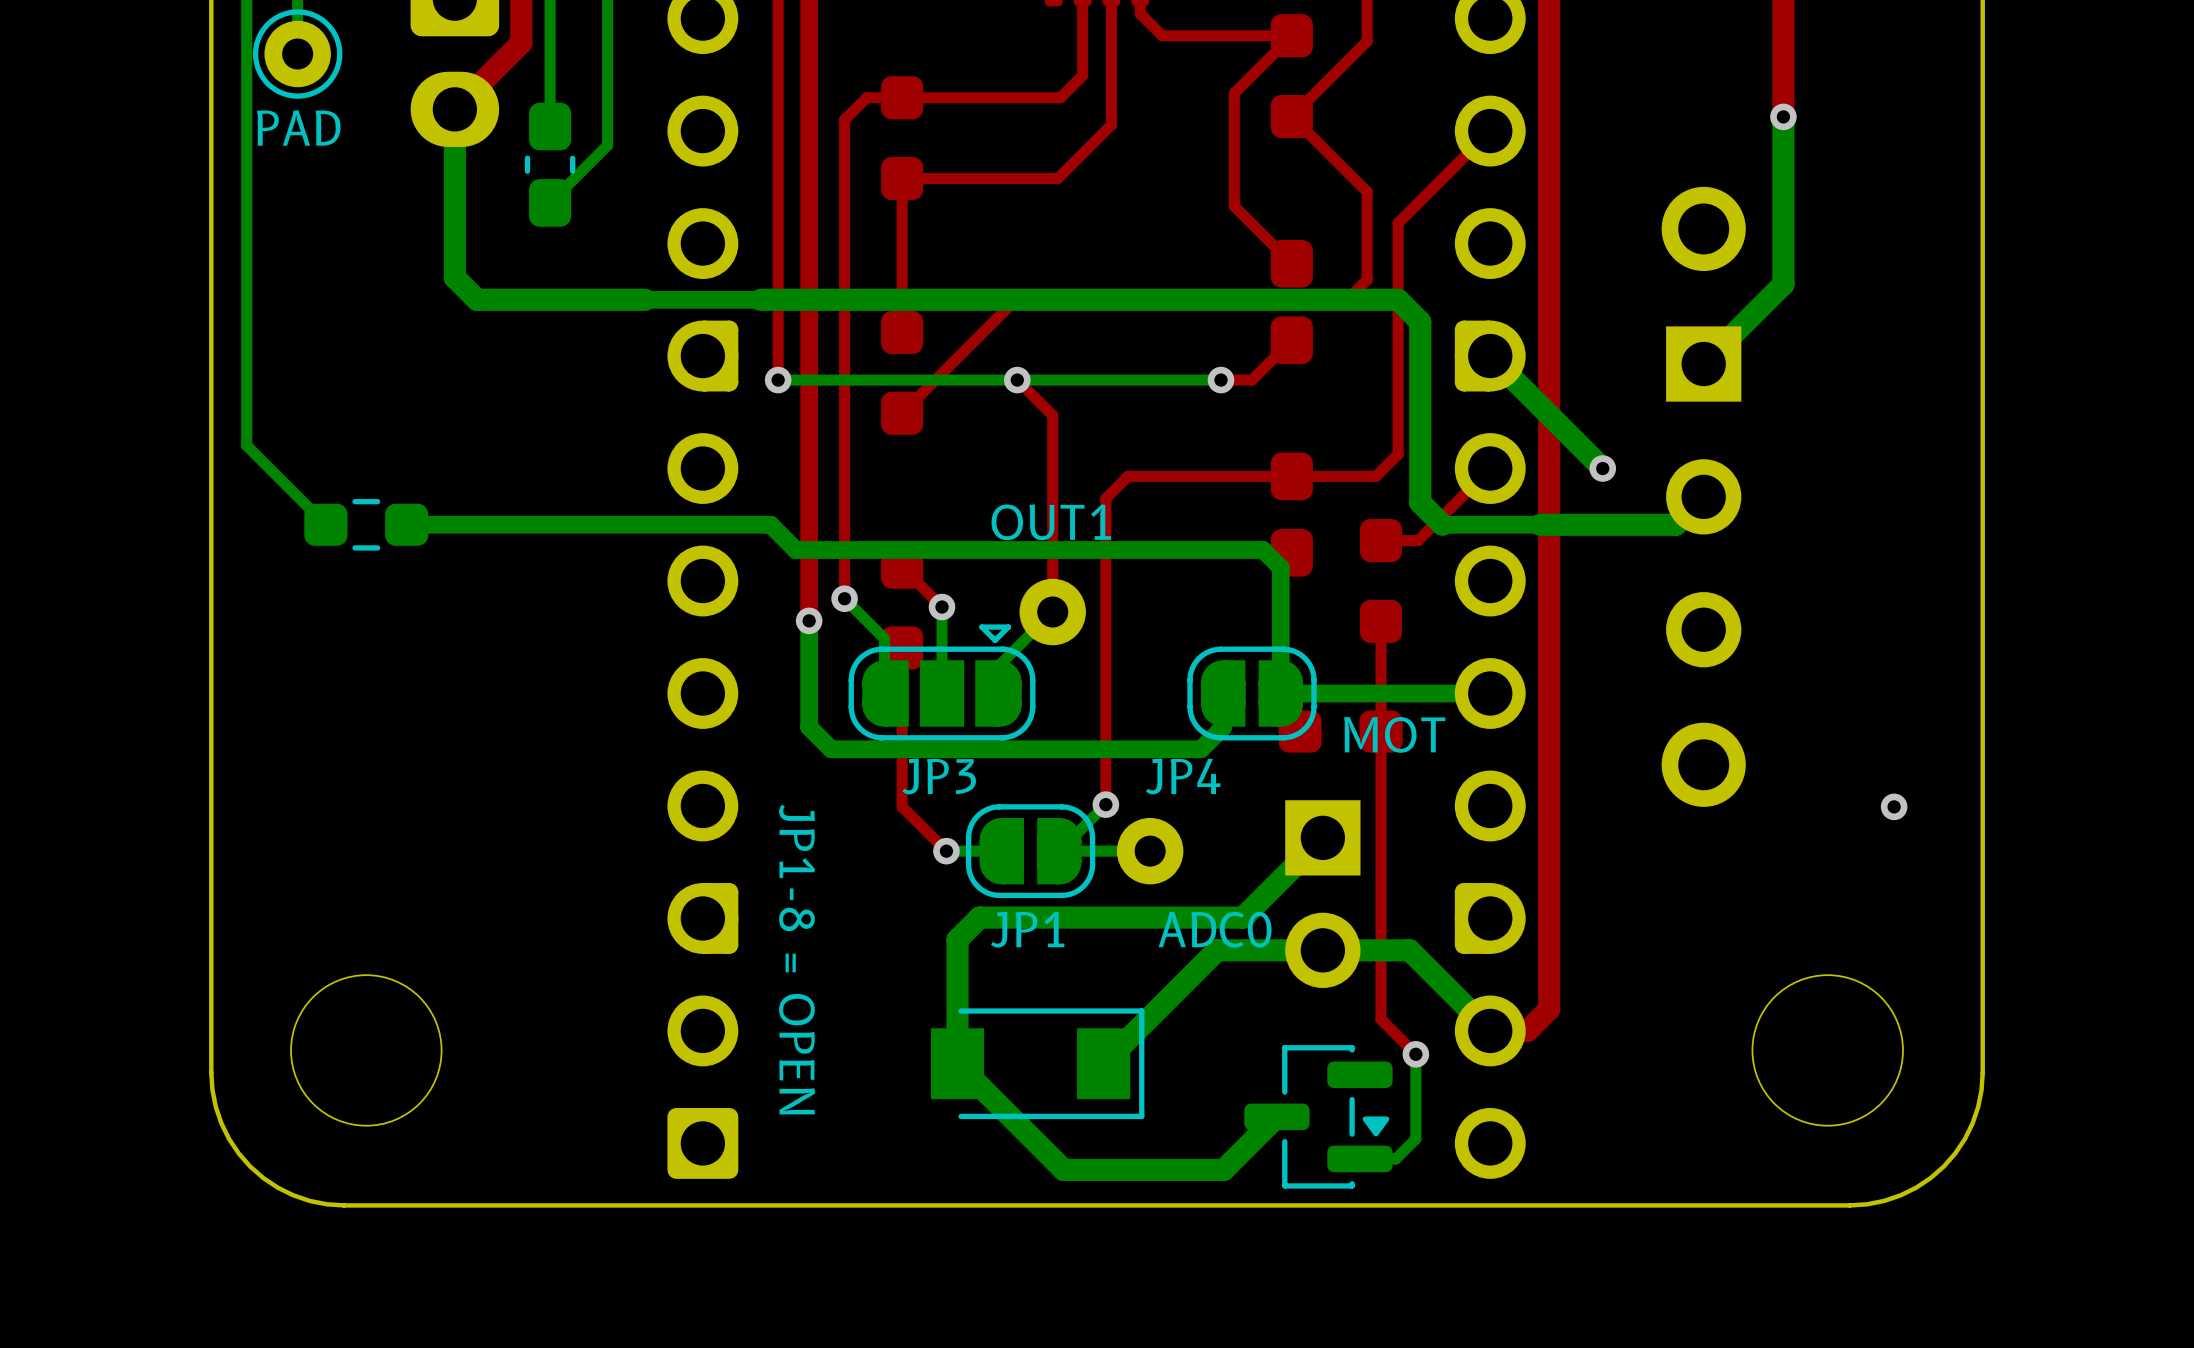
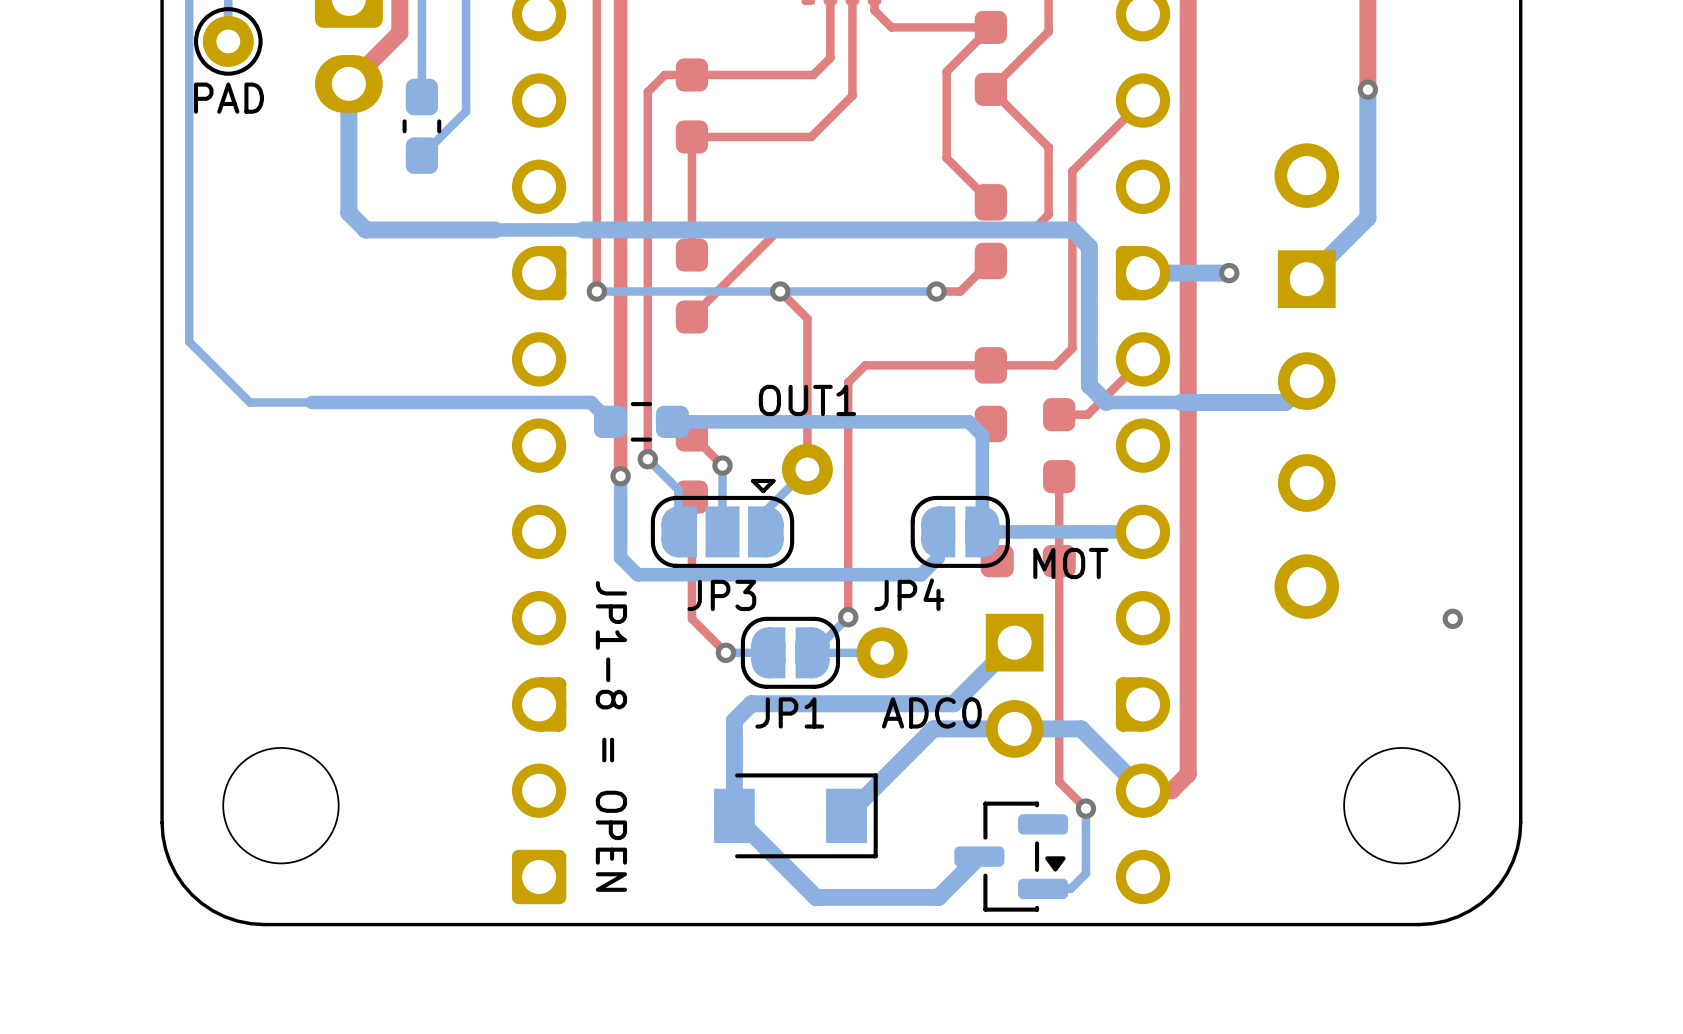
bottom track: (1490, 356) (1602, 468) -> (1143, 273) (1229, 273)
via position: (1602, 468) -> (1229, 273)
part position: (366, 524) -> (641, 421)
bottom track: (876, 550) (795, 550) -> (311, 402) (249, 402)

